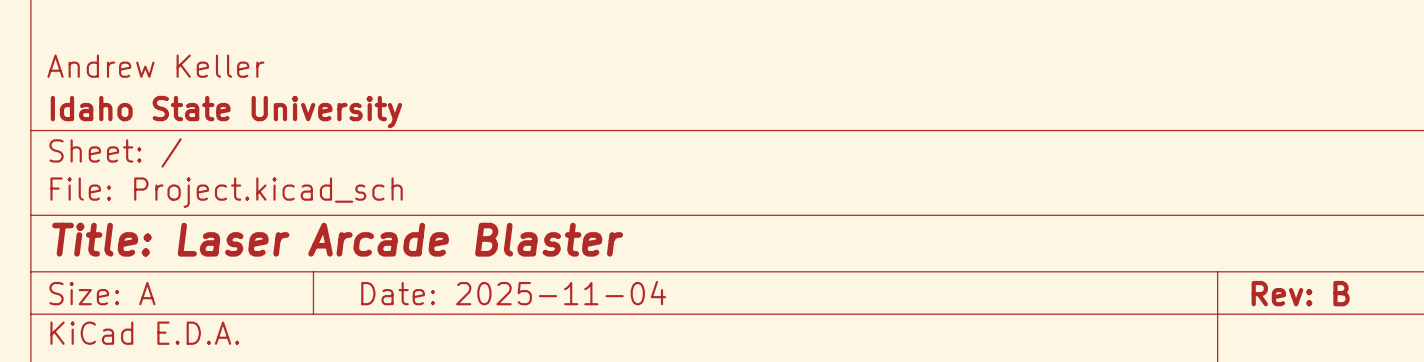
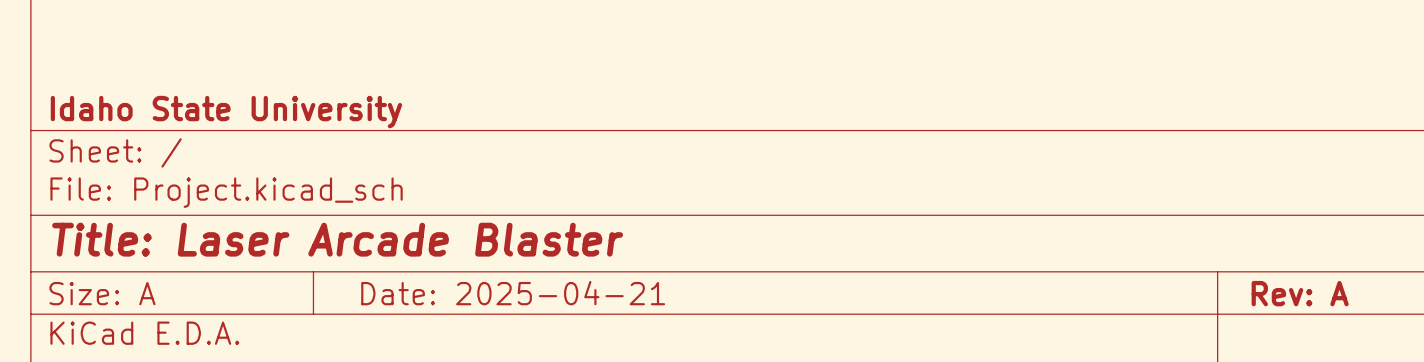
title block: Andrew Keller (155, 66) -> none
title block: Date: 2025-11-04 (513, 293) -> Date: 2025-04-21 (513, 293)
title block: Rev: B (1300, 293) -> Rev: A (1300, 293)

